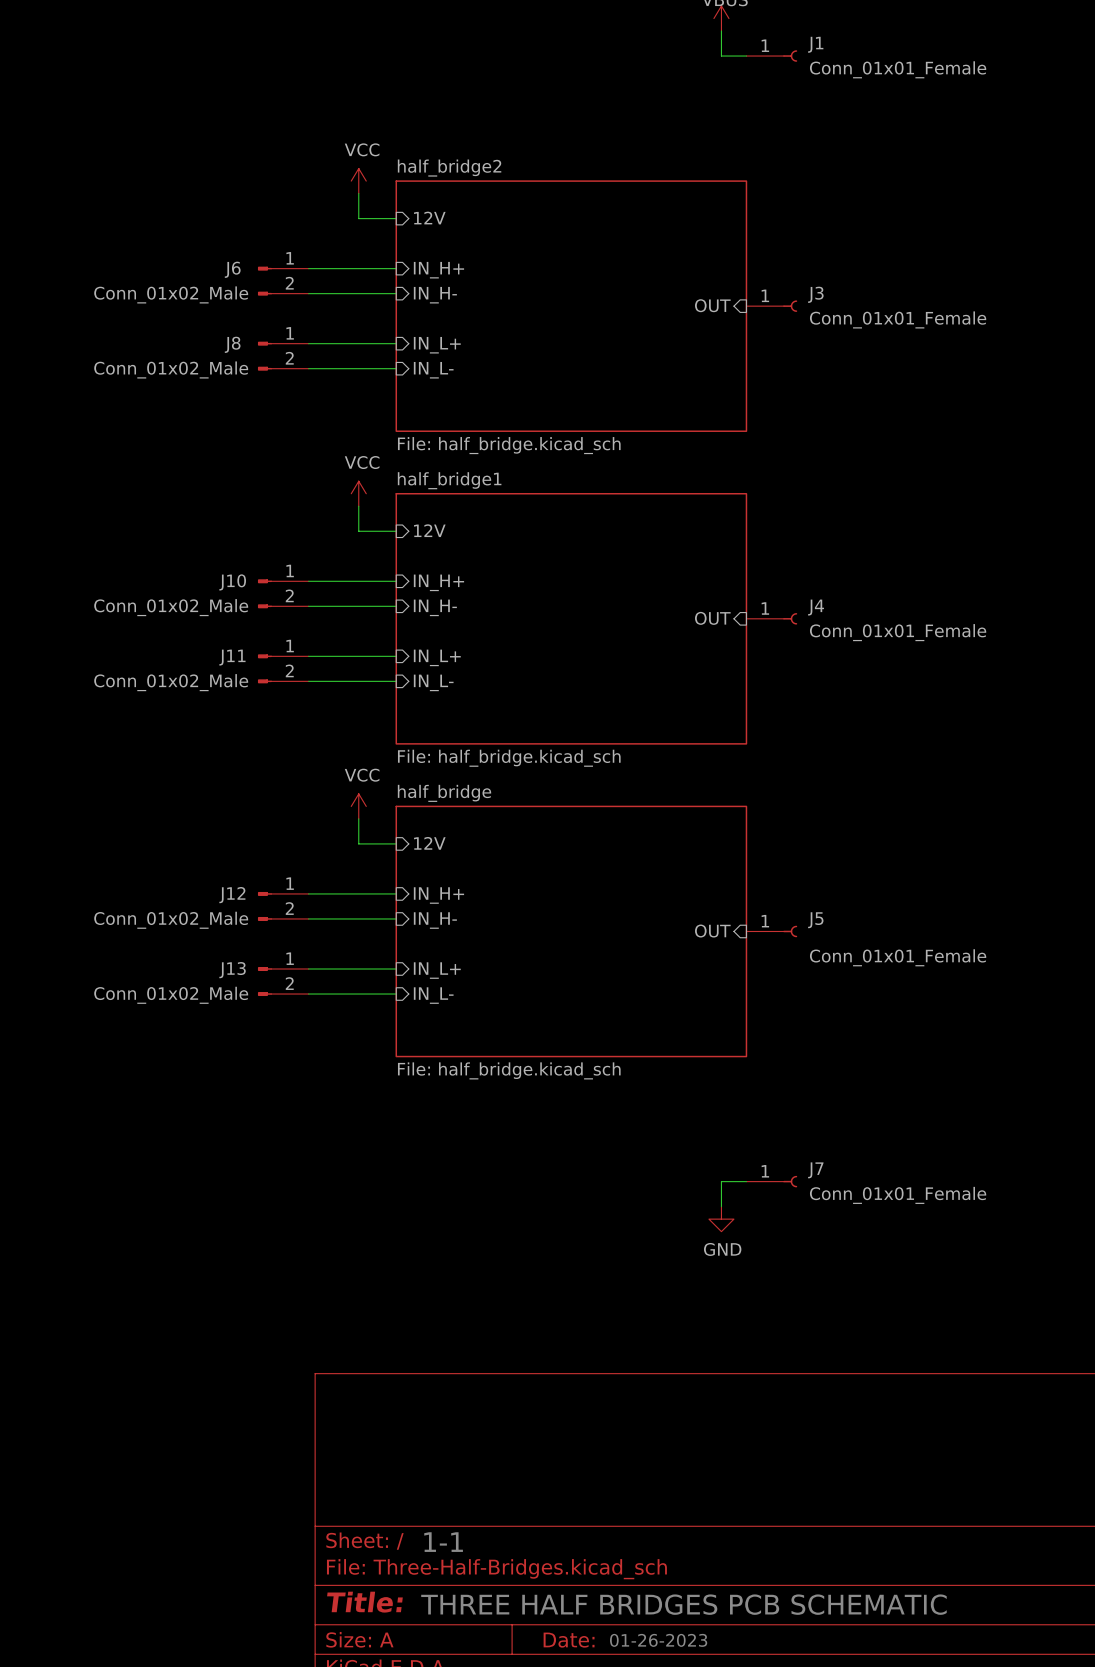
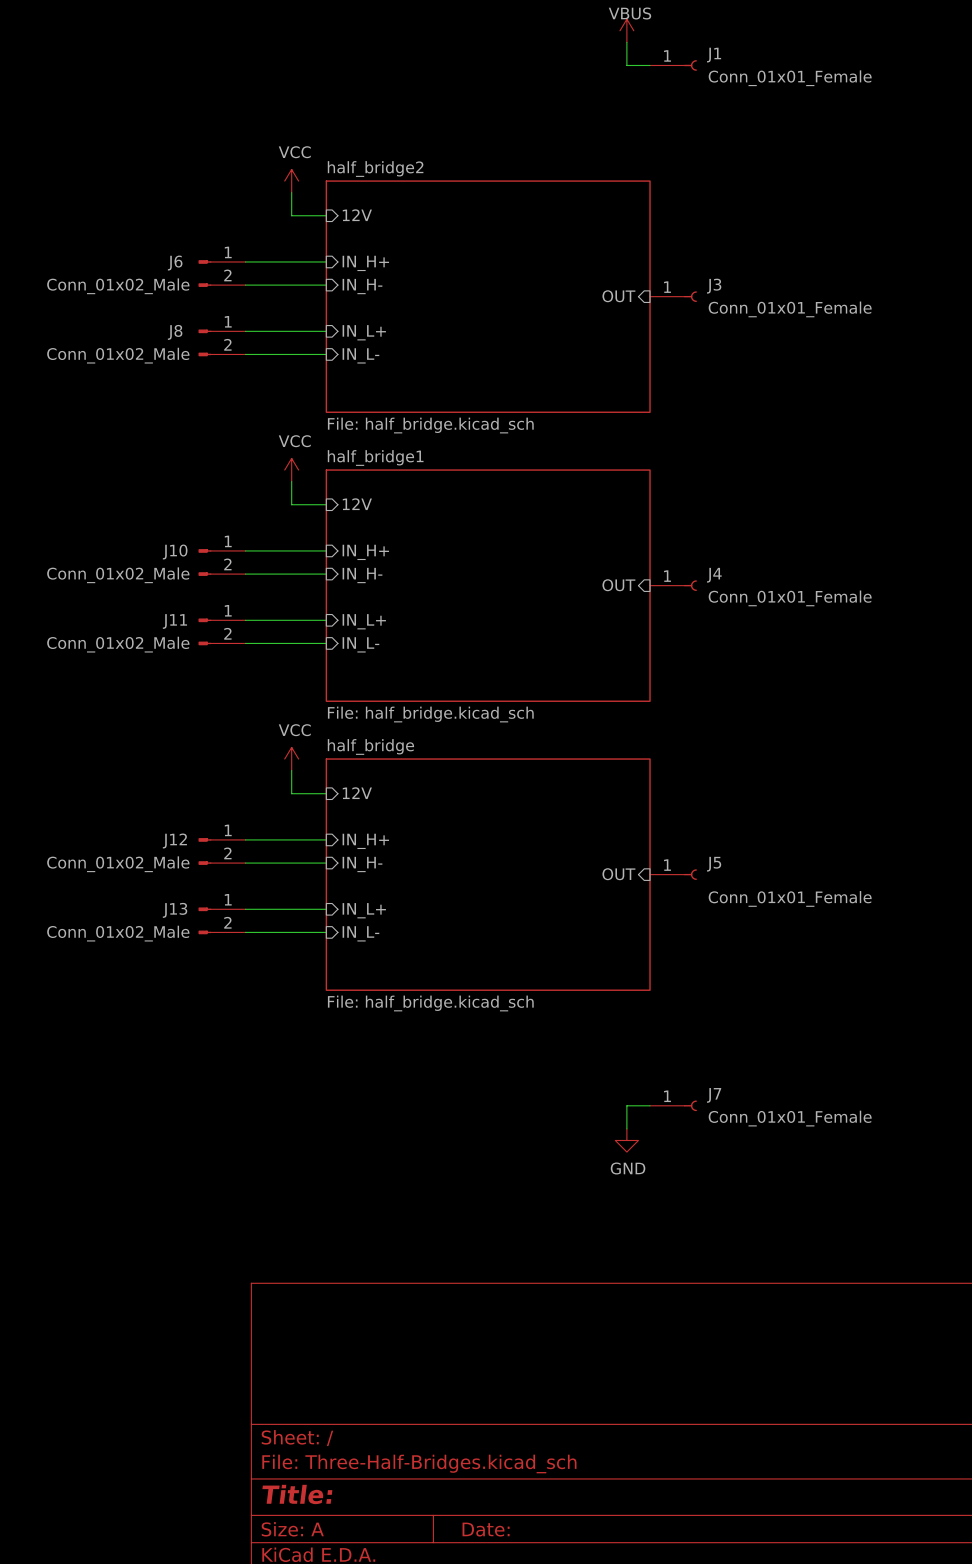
text: 1-1 (443, 1542) -> none
text: THREE HALF BRIDGES PCB SCHEMATIC (683, 1604) -> none
text: 01-26-2023 (658, 1640) -> none

